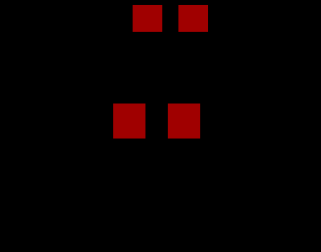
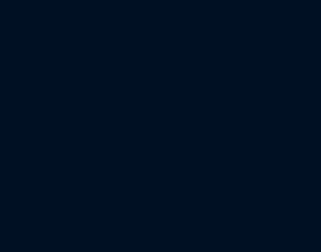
part: (170, 18) -> none
part: (156, 121) -> none

